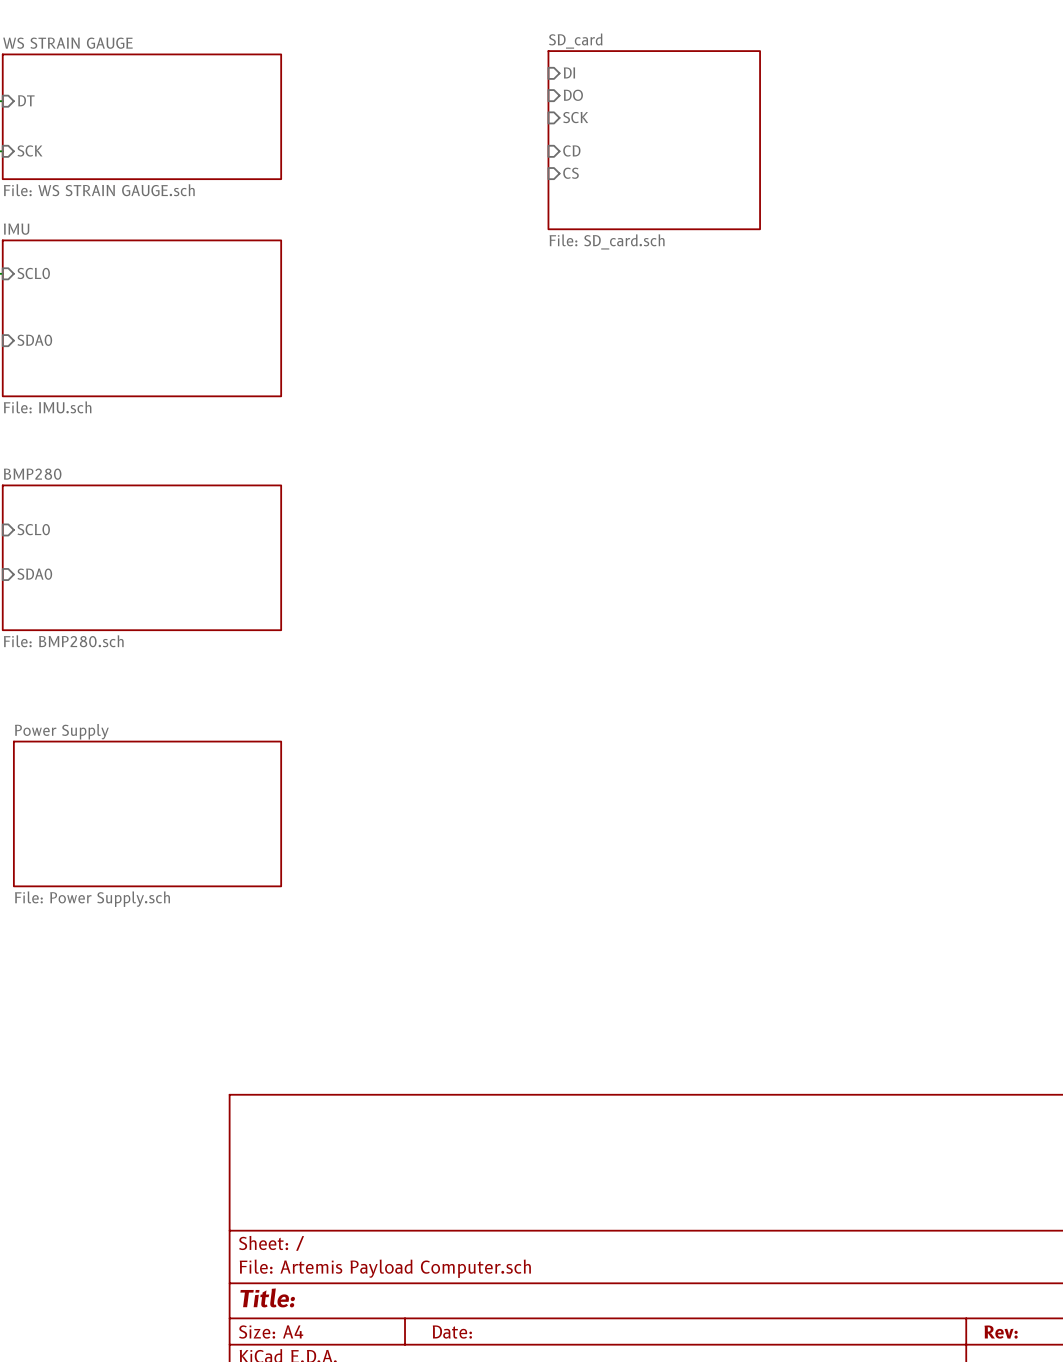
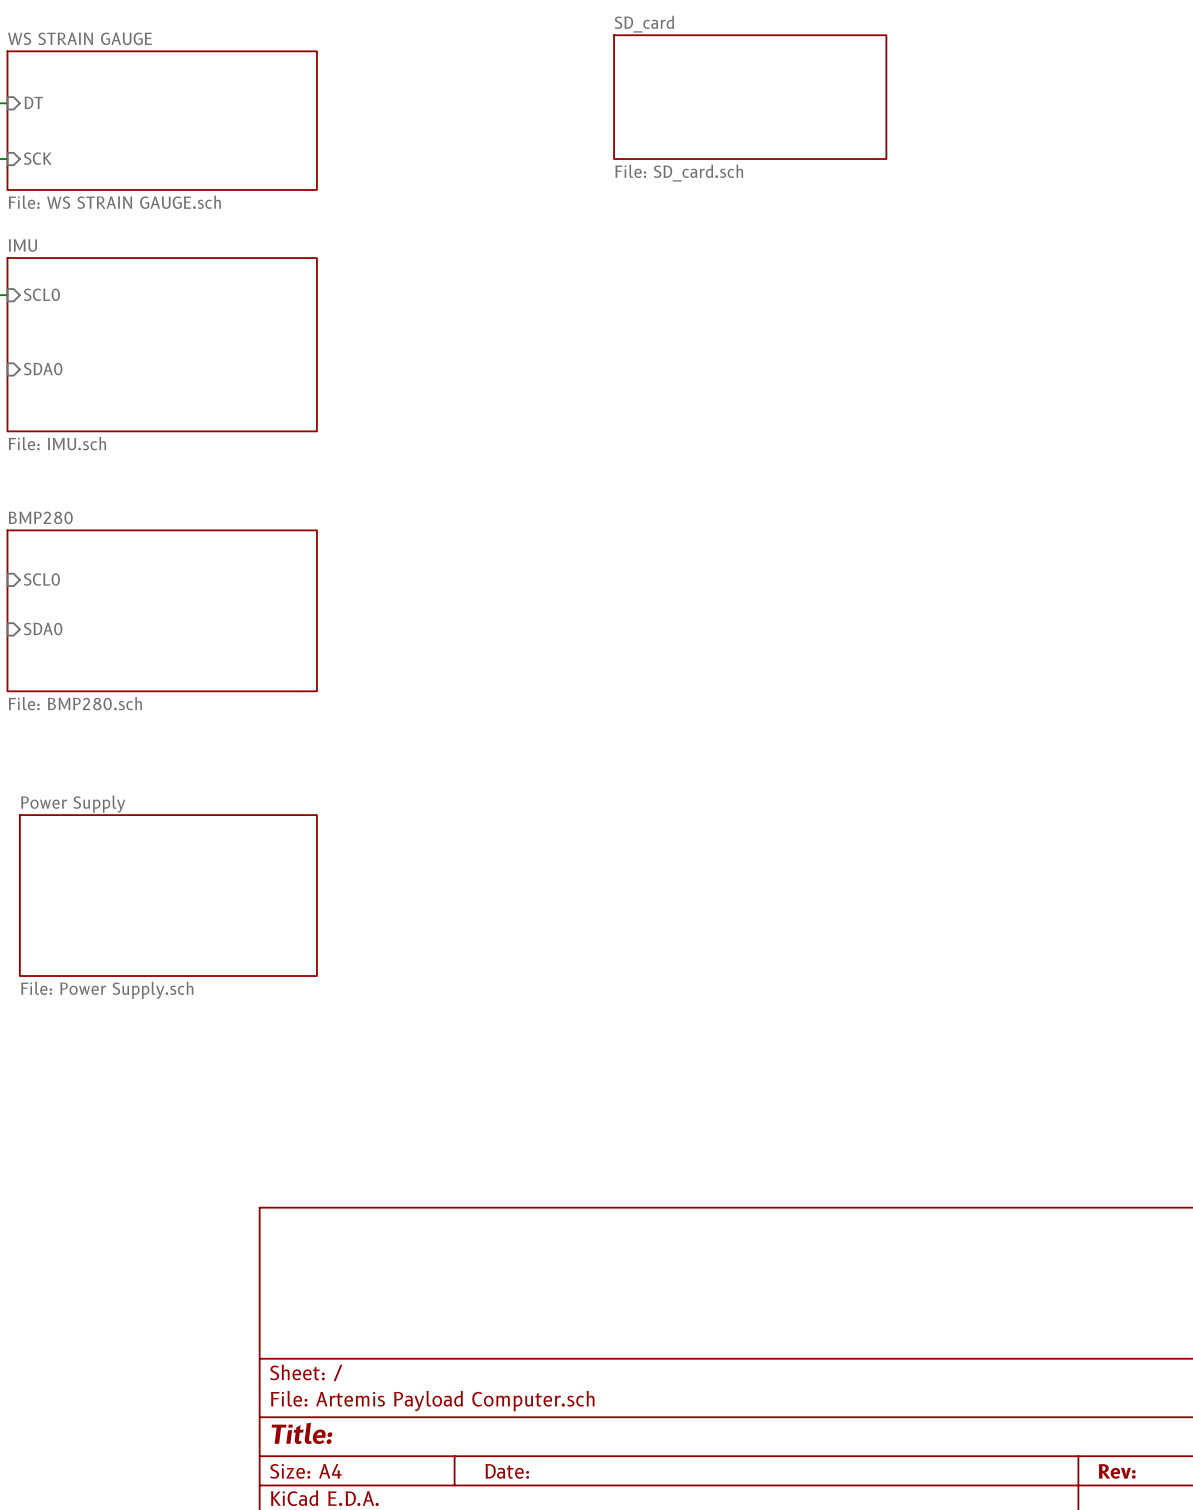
sheet pin: DI (569, 72) -> none
sheet pin: DO (573, 95) -> none
sheet SD_card: none -> File: SD_card.sch (750, 97)
sheet pin: SCK (575, 117) -> none
sheet SD_card: File: SD_card.sch (654, 140) -> none
sheet pin: CD (571, 150) -> none
sheet pin: CS (571, 173) -> none

